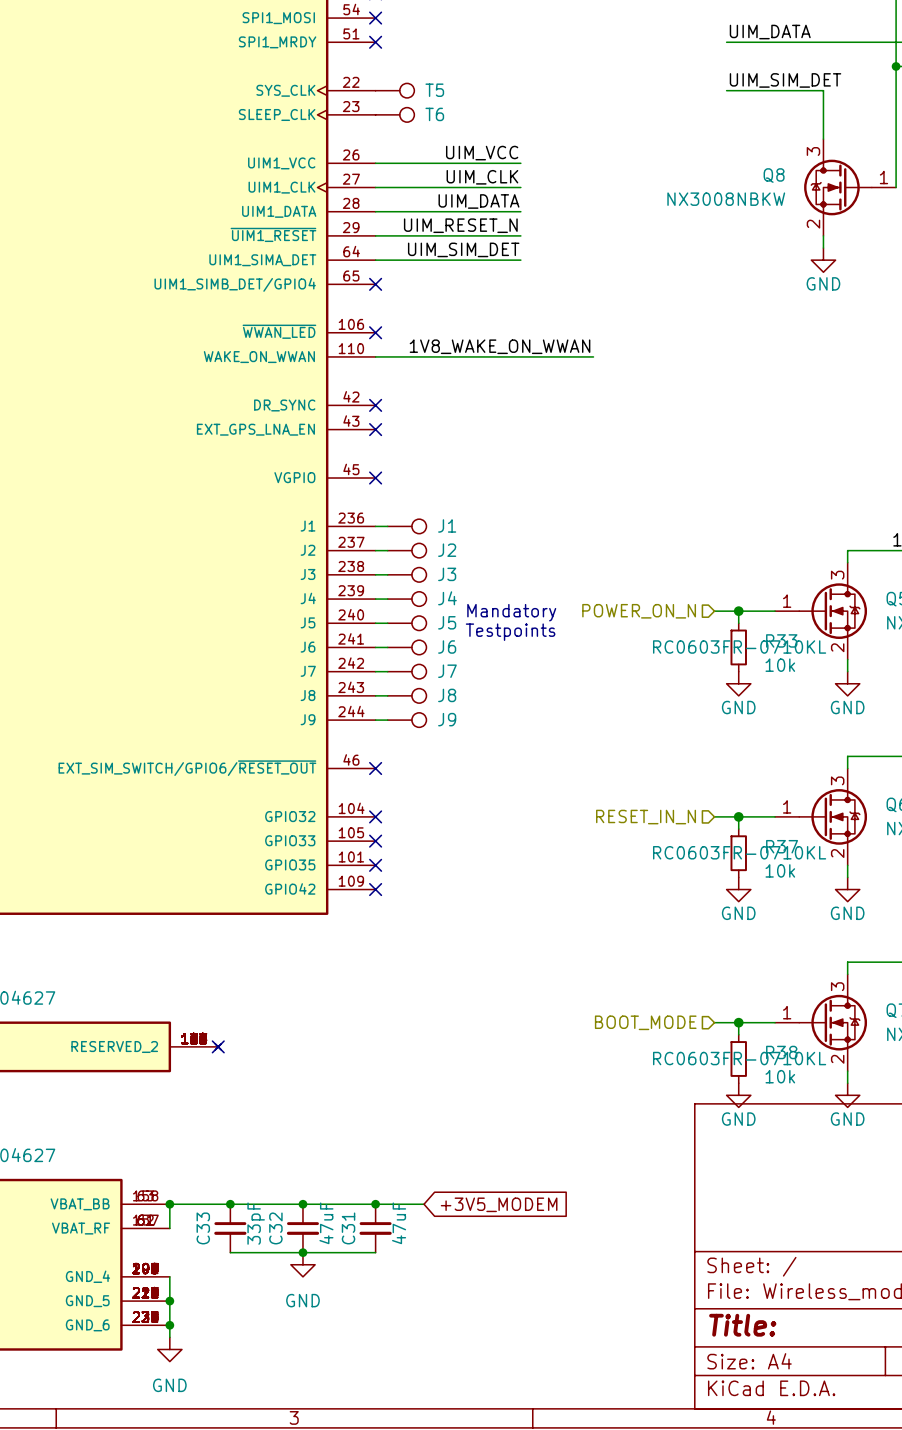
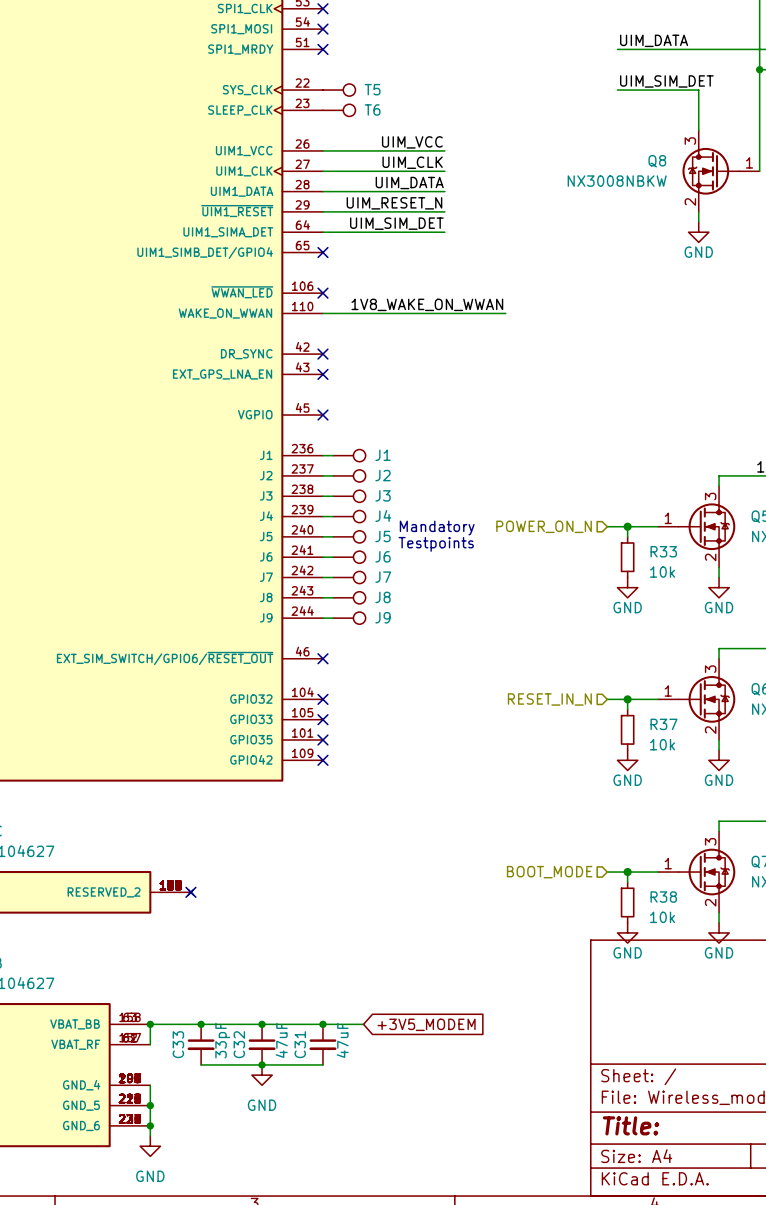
R33 text: RC0603FR-0710KL (739, 647) -> none
R37 text: RC0603FR-0710KL (739, 852) -> none
R38 text: RC0603FR-0710KL (739, 1058) -> none

